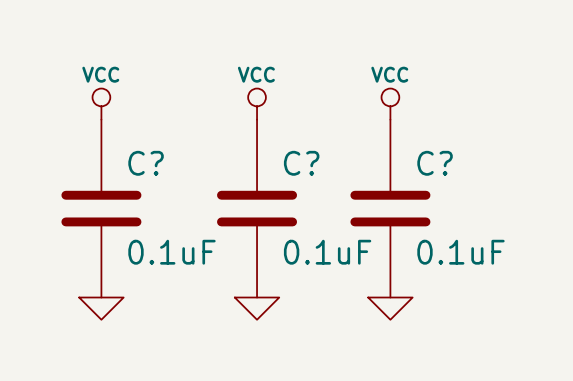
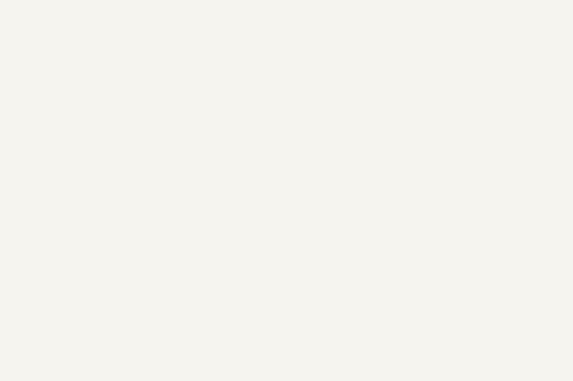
power symbol: VCC (101, 104) -> none
power symbol: VCC (257, 104) -> none
power symbol: VCC (390, 104) -> none
C?: 0.1uF (101, 208) -> none
C?: 0.1uF (257, 208) -> none
C?: 0.1uF (390, 208) -> none
power symbol: (101, 308) -> none
power symbol: (257, 308) -> none
power symbol: (390, 308) -> none

